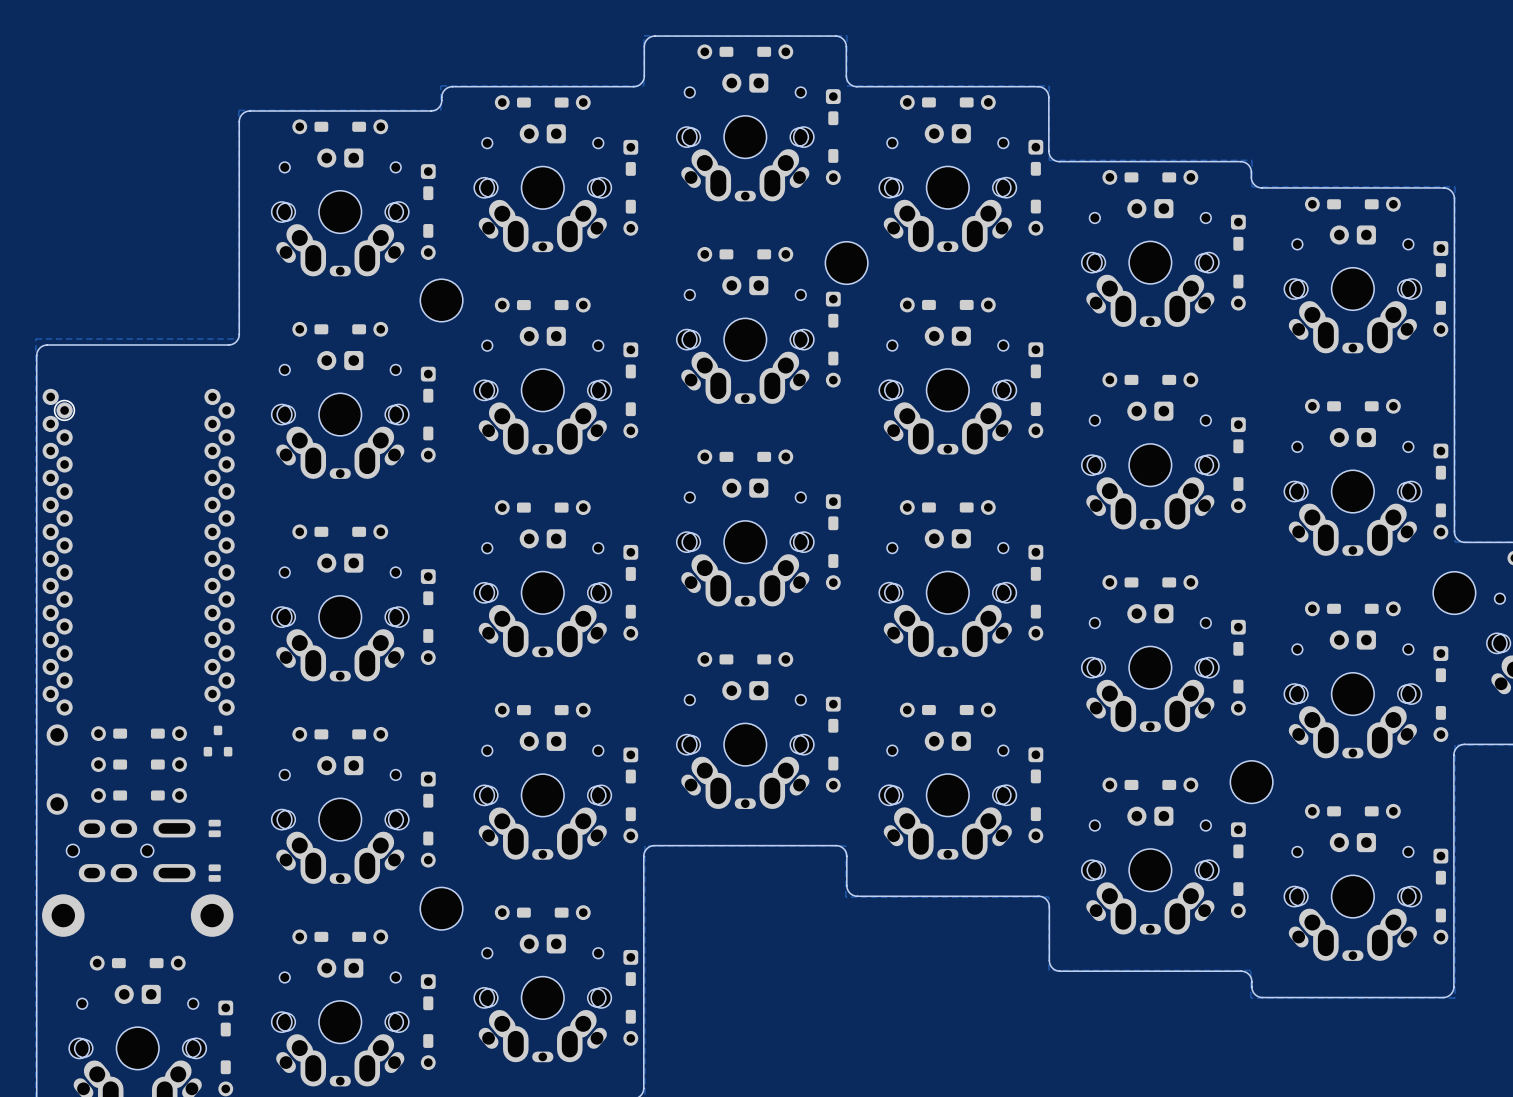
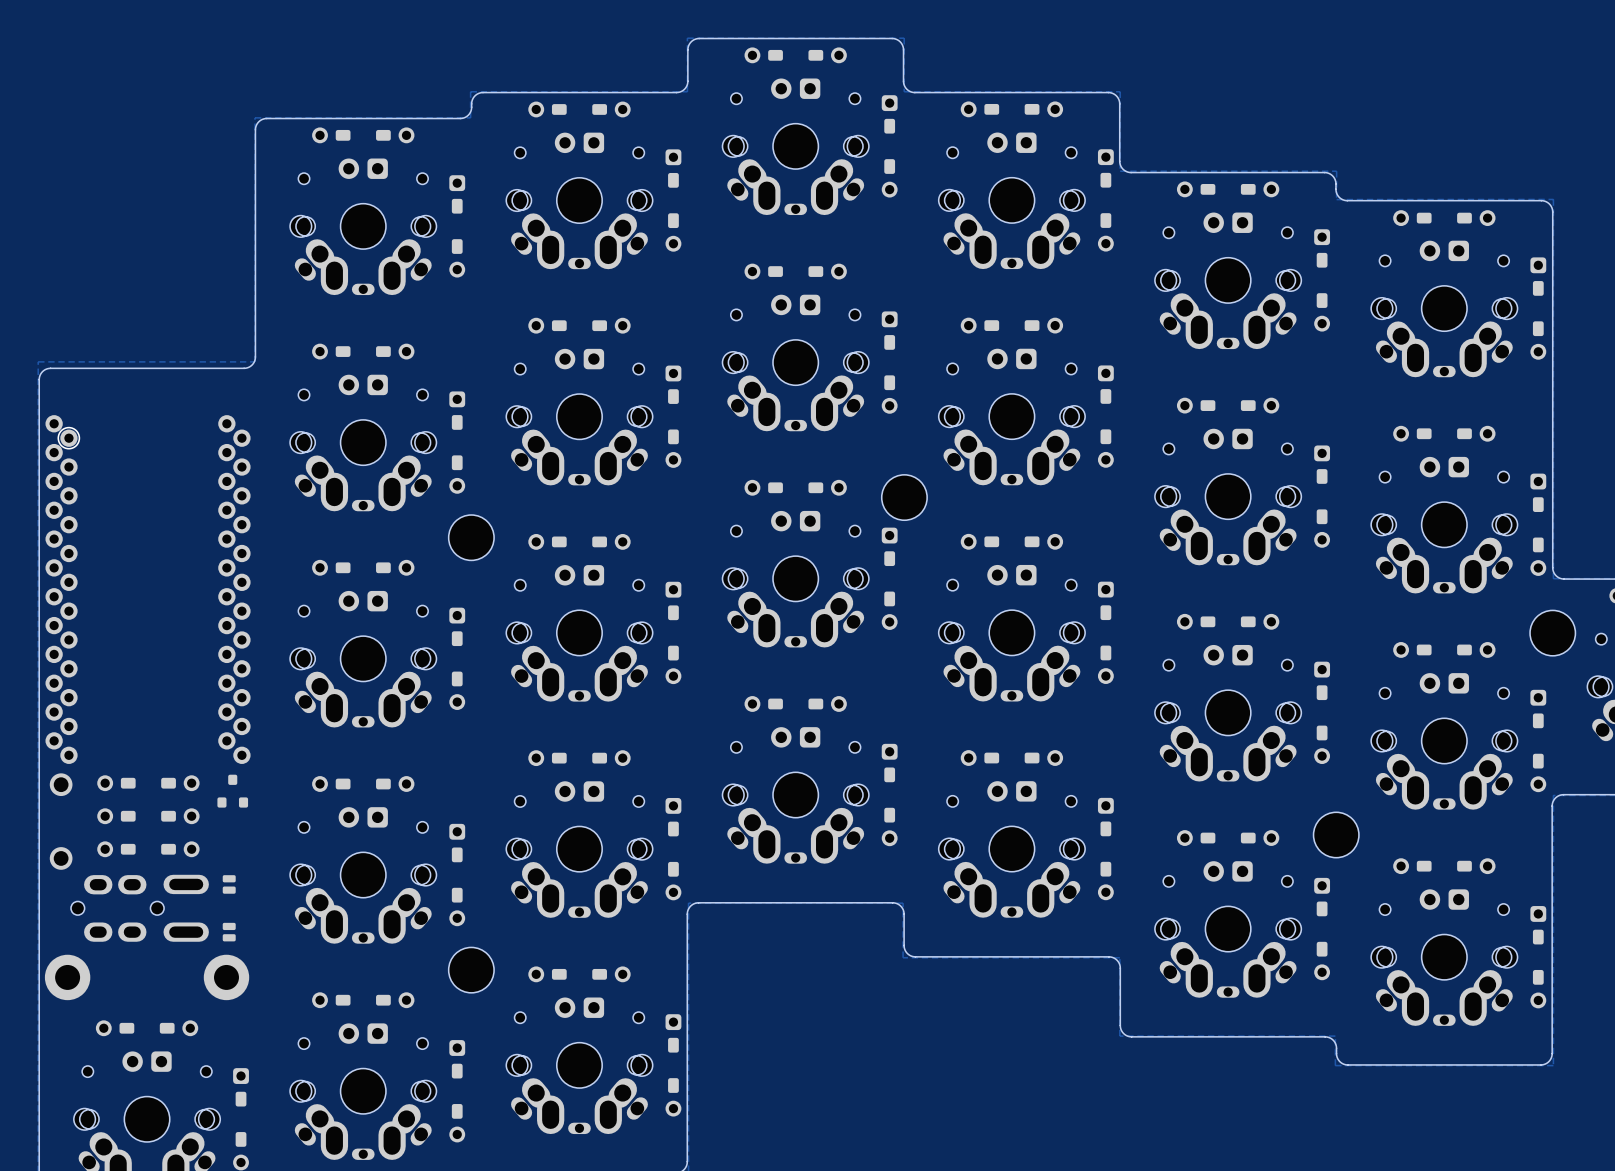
part position: (846, 263) -> (904, 497)
part position: (441, 300) -> (471, 537)

